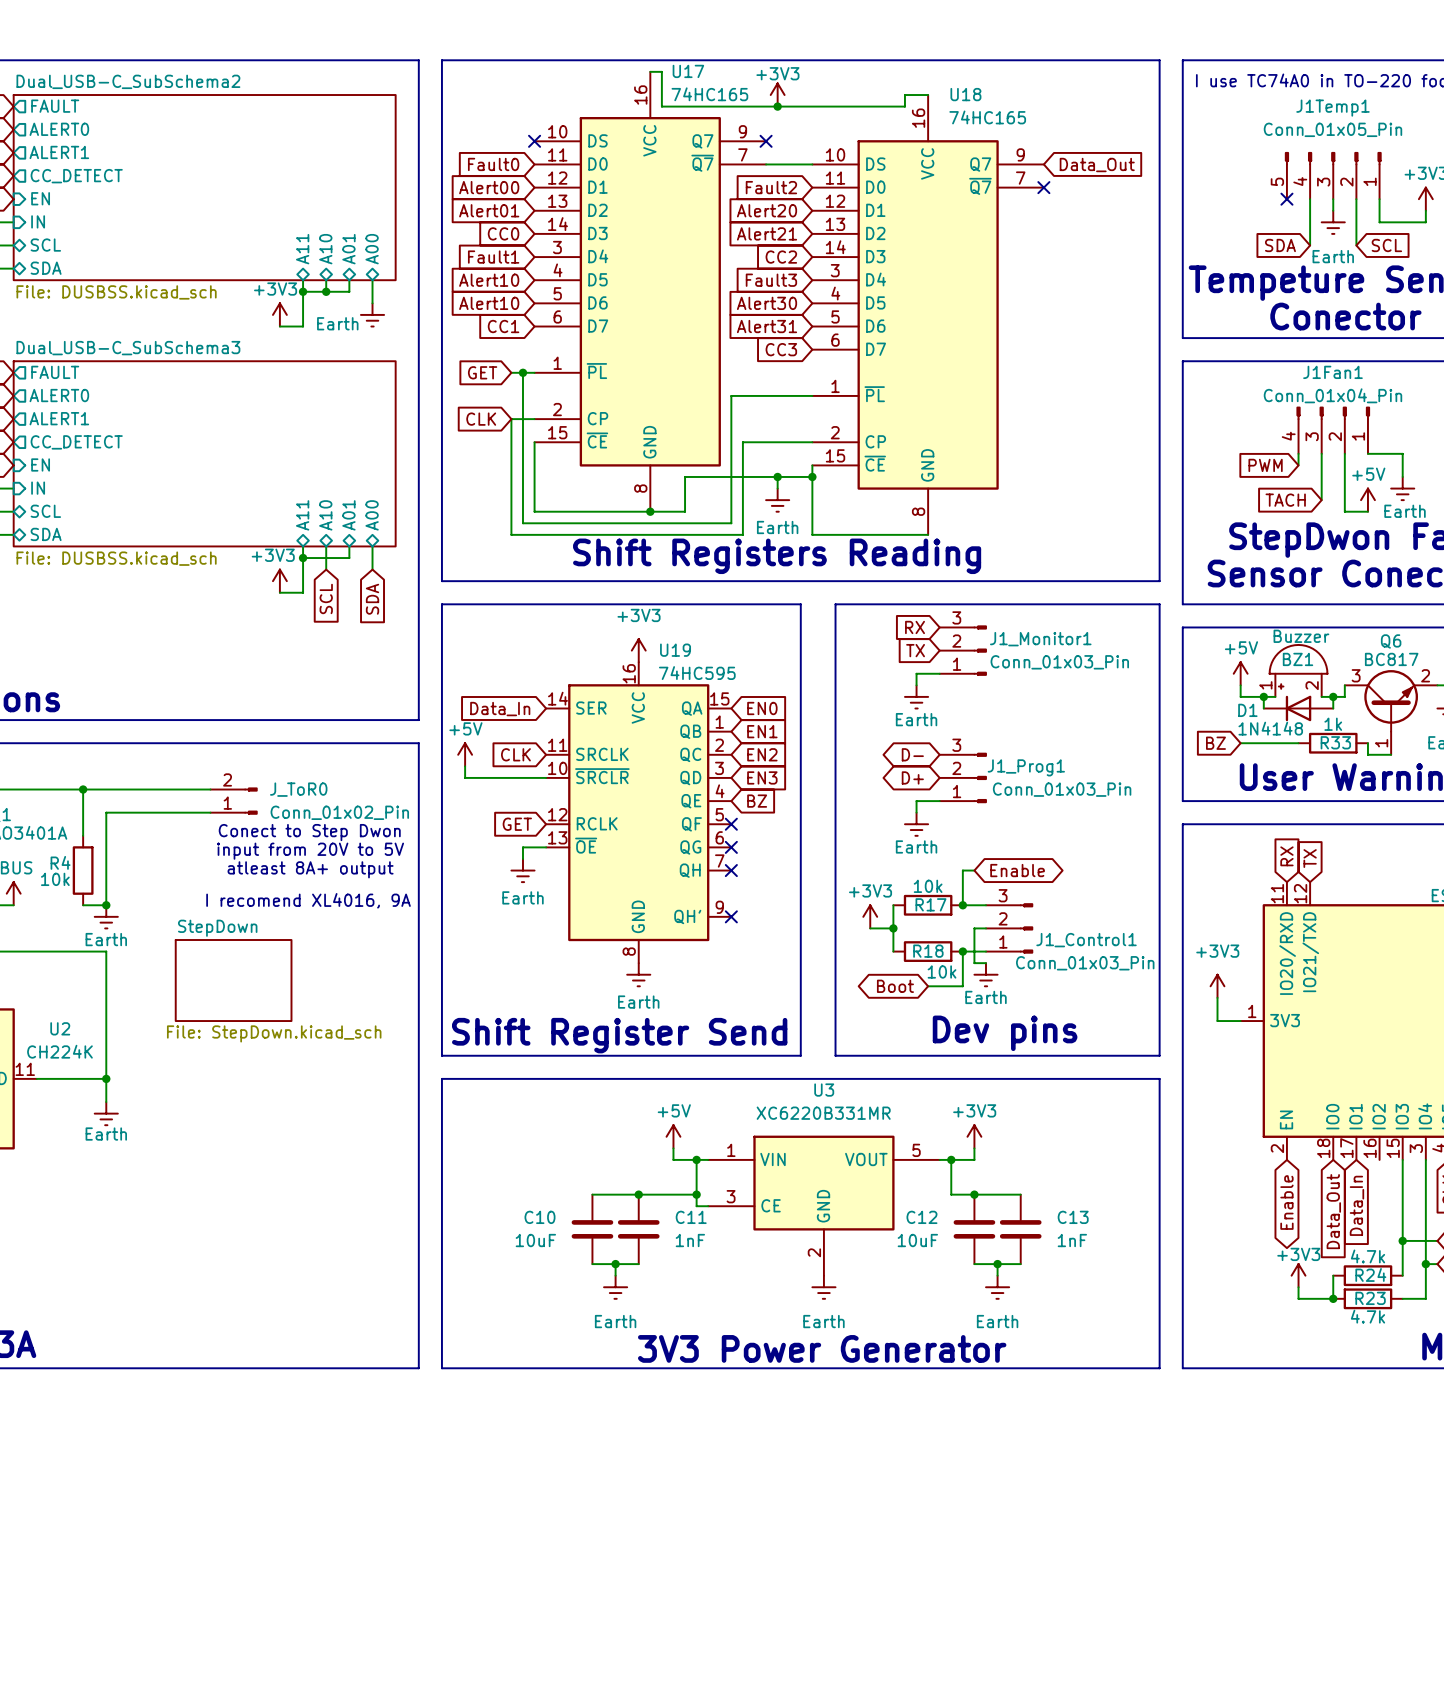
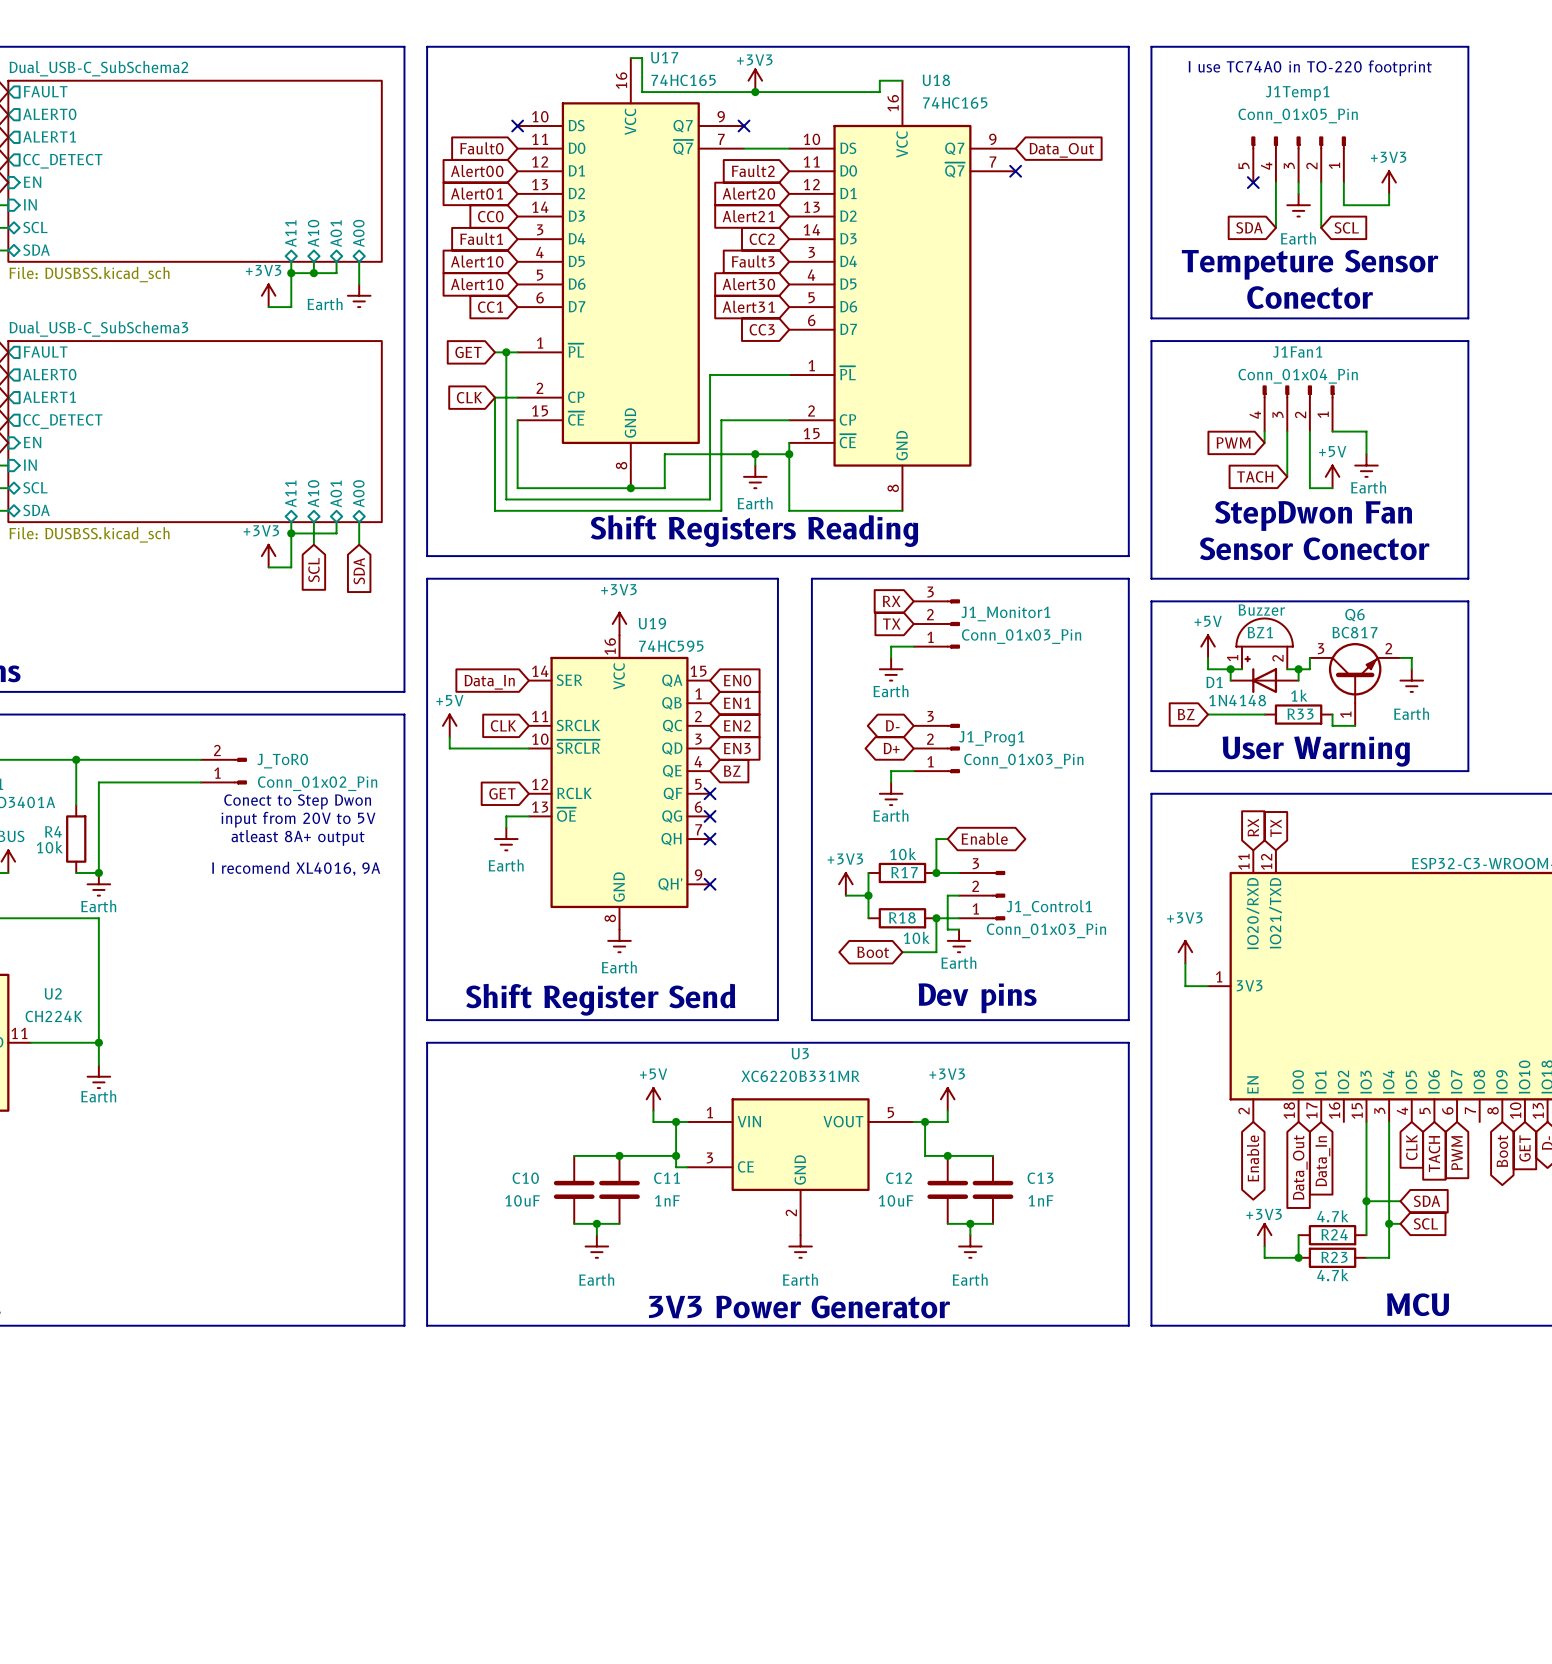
sheet StepDown: File: StepDown.kicad_sch (233, 980) -> none

